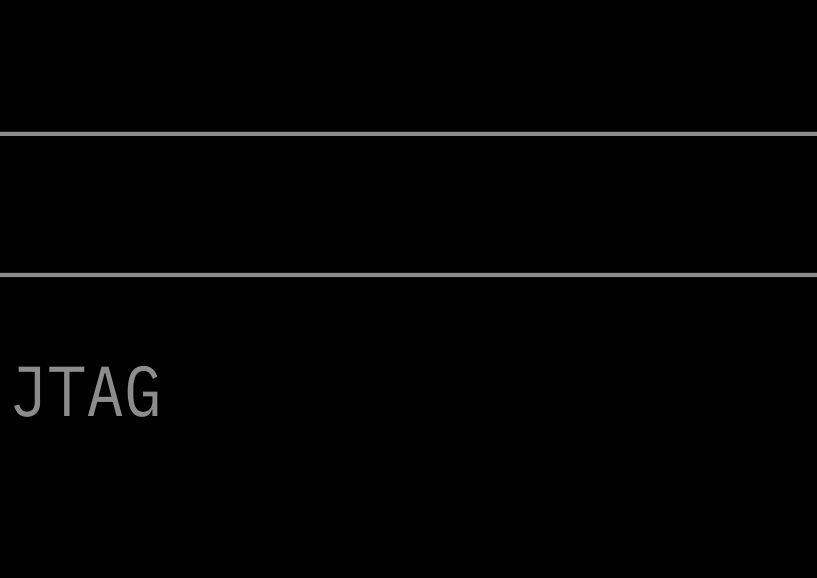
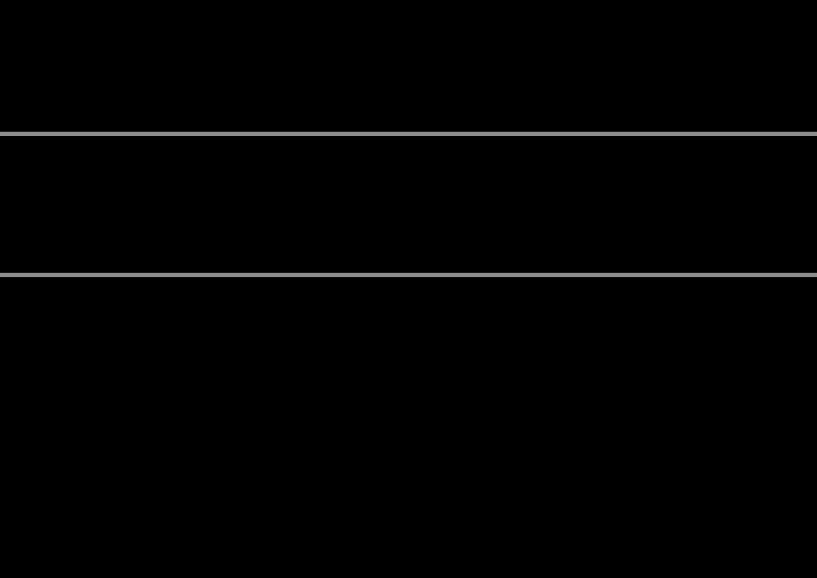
text: JTAG (85, 391) -> none

